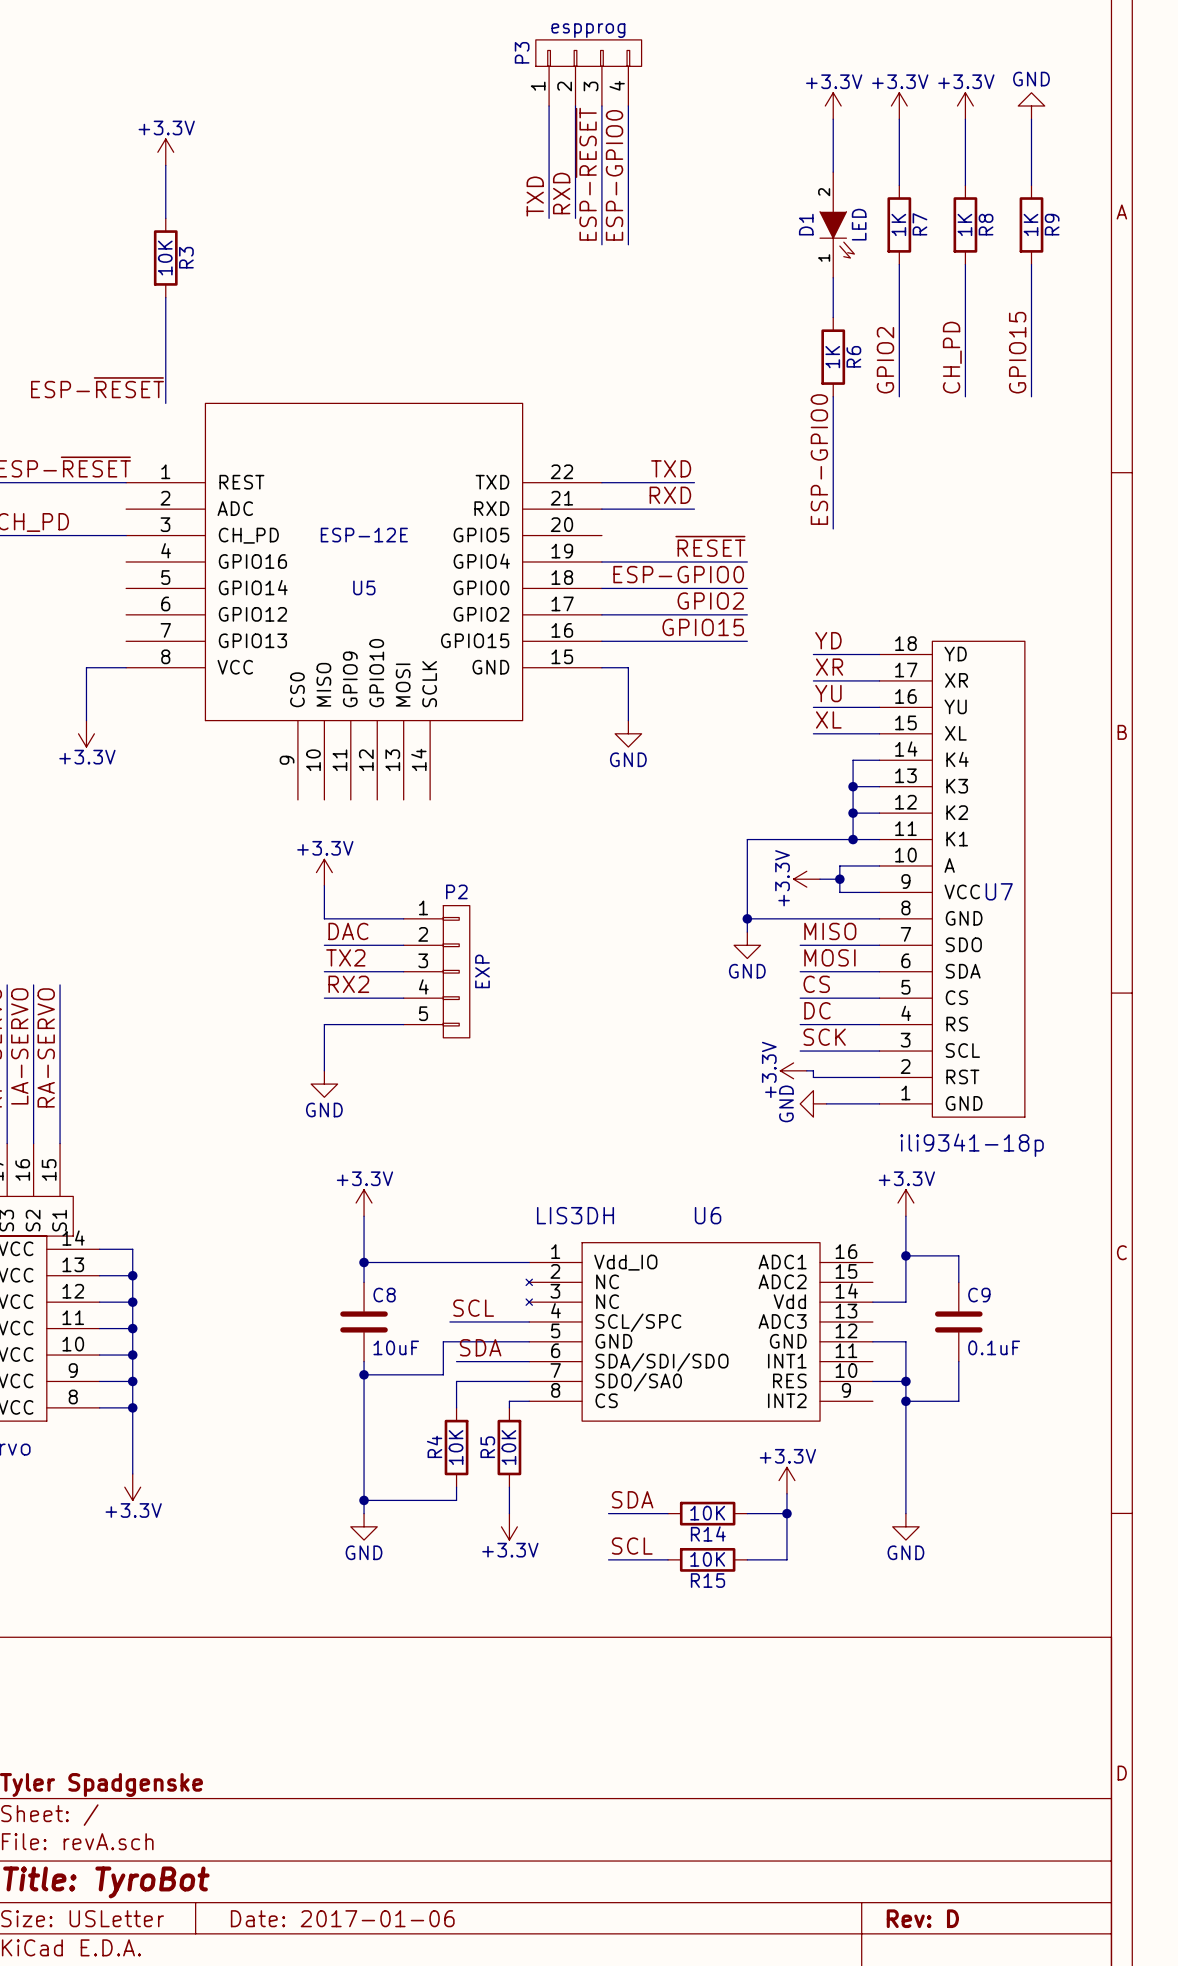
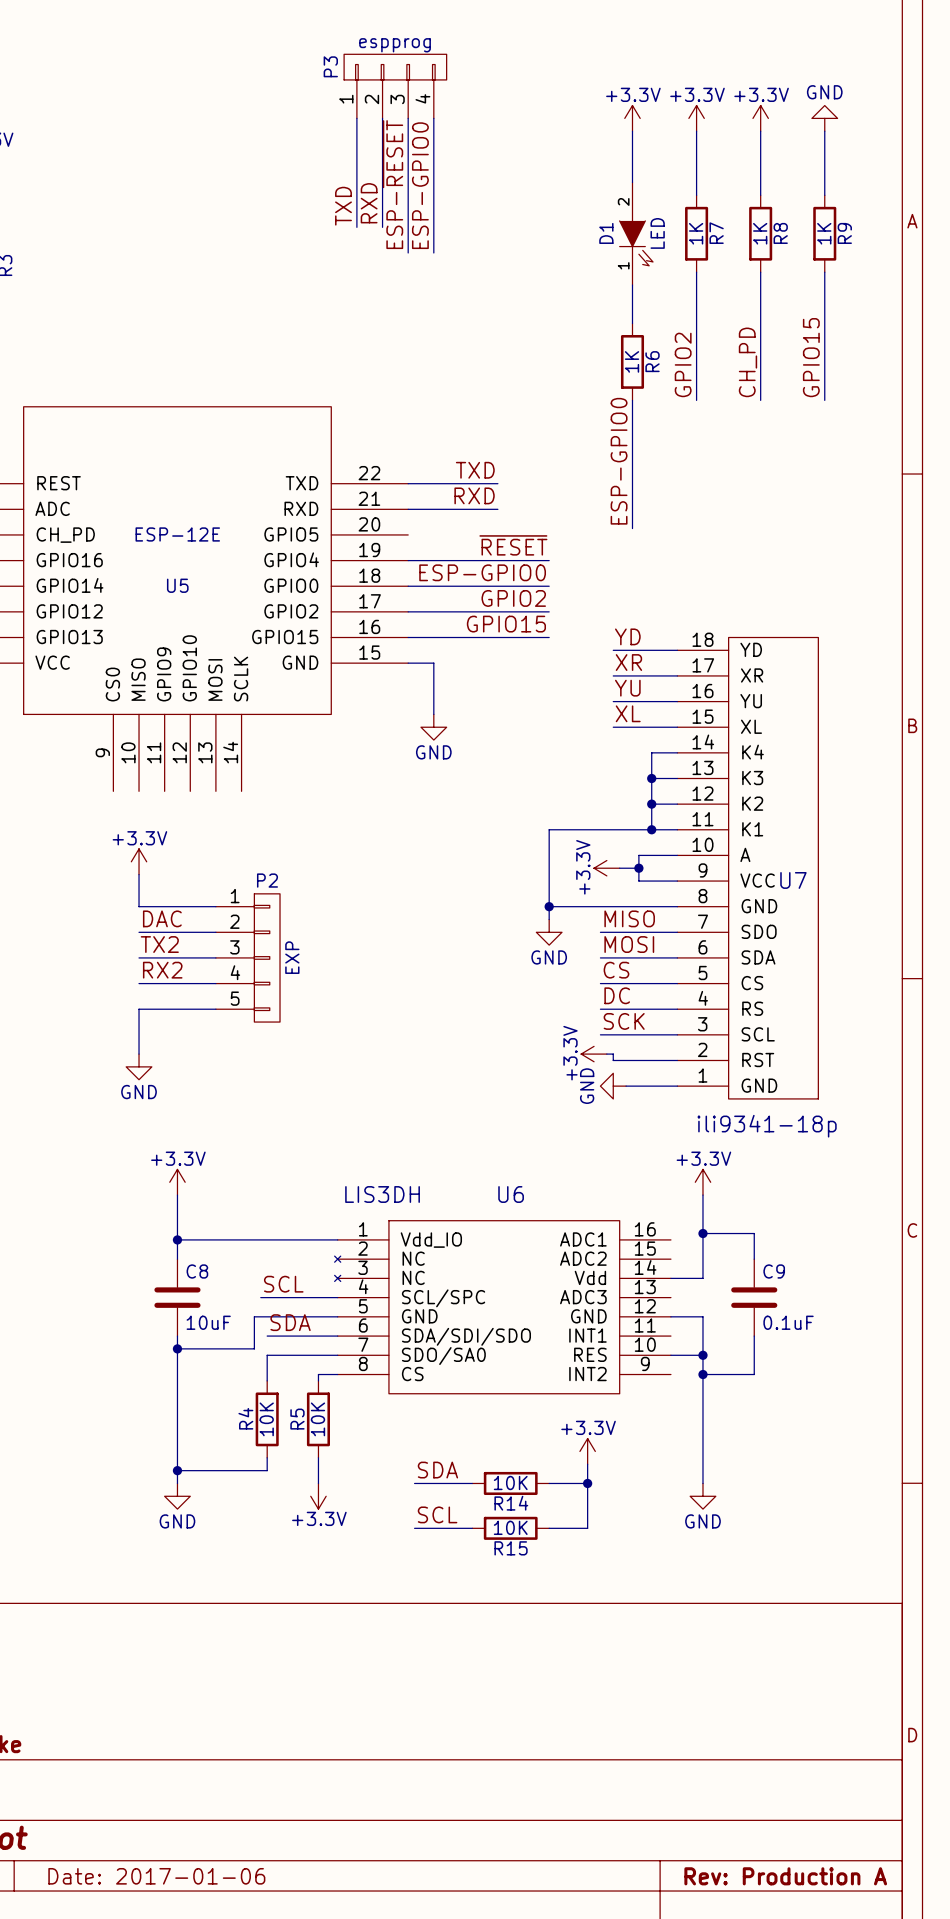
title block: Rev: D (922, 1918) -> Rev: Production A (785, 1876)

